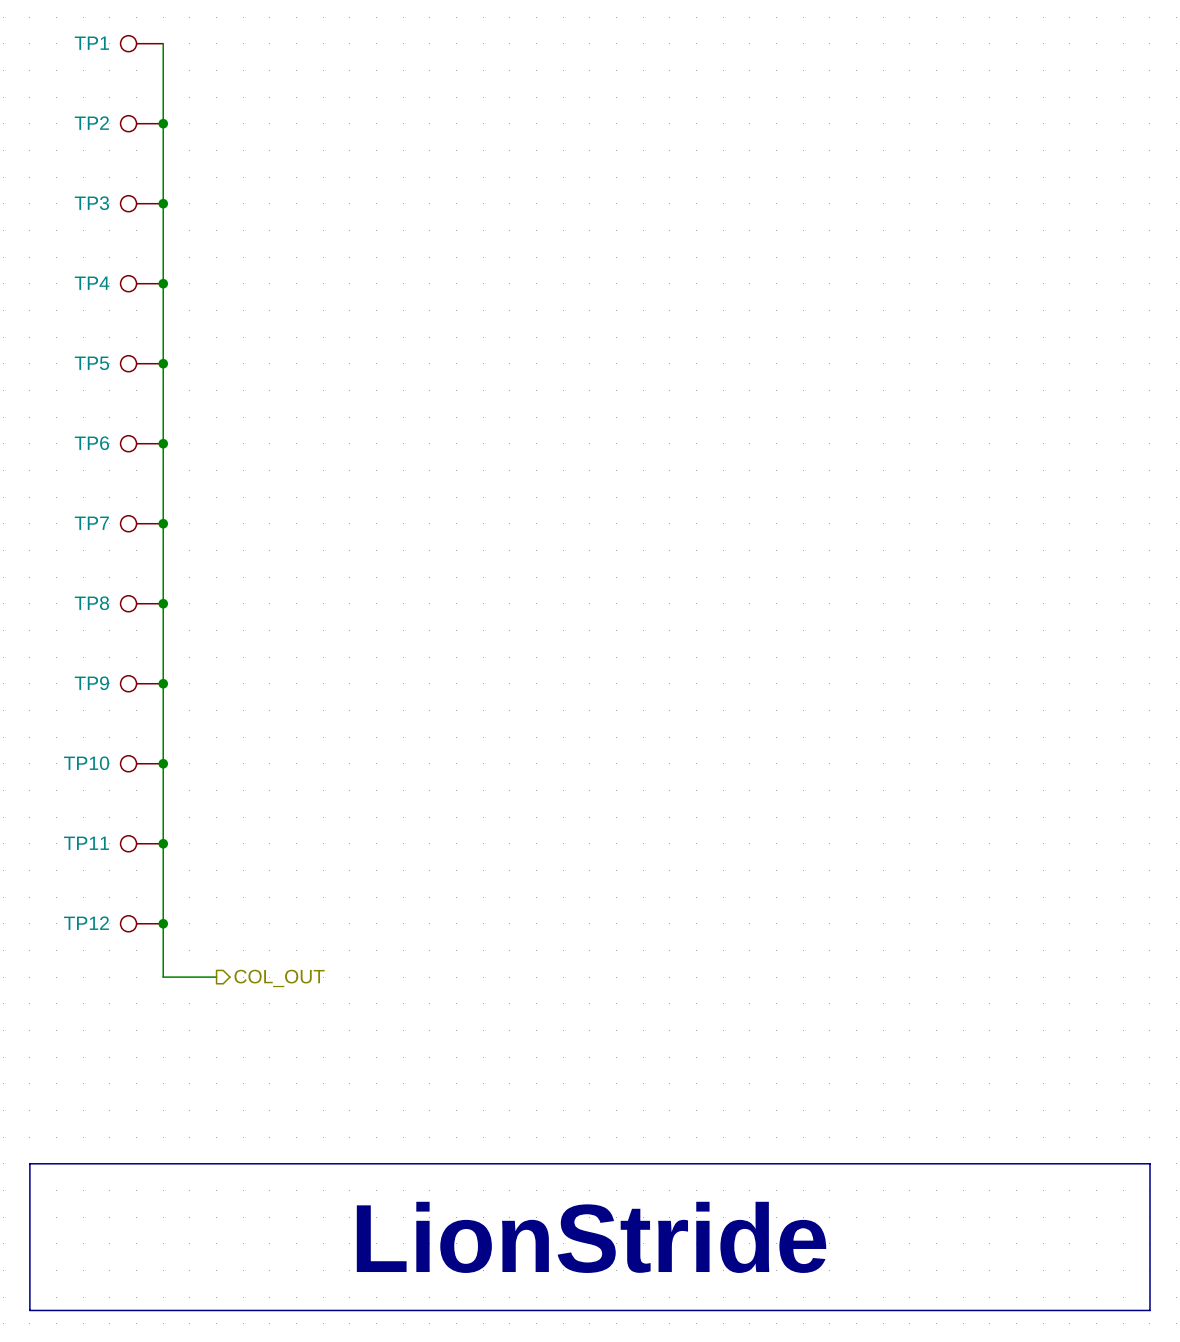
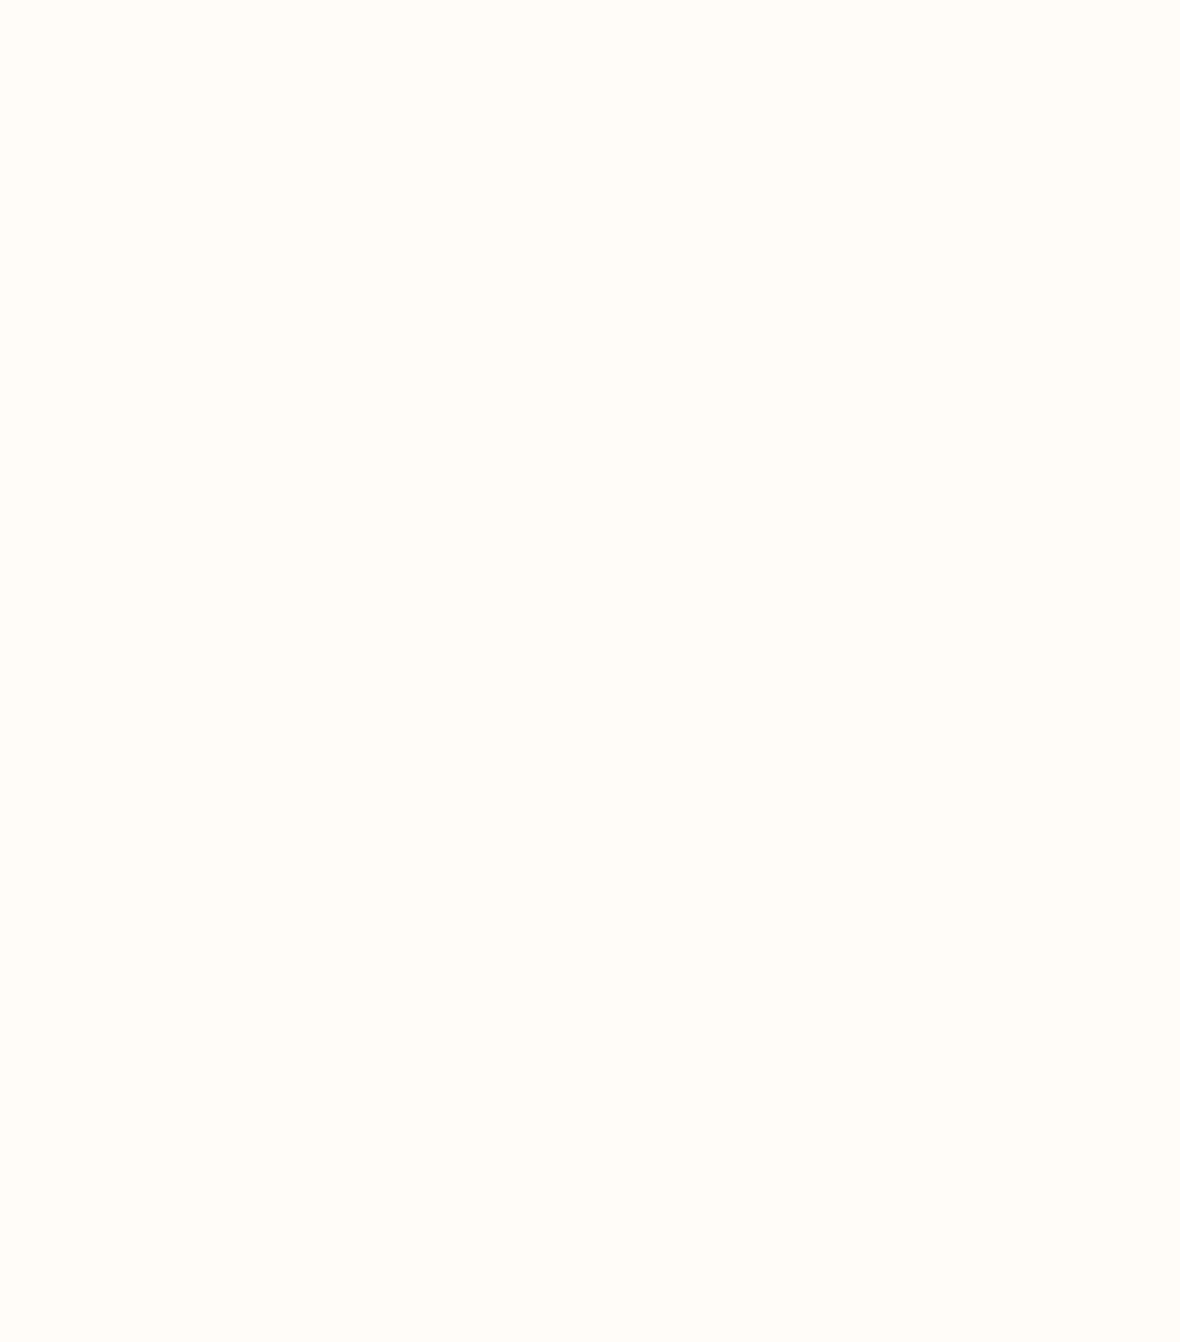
TP1: (141, 43) -> none
wire: (163, 43) (163, 977) (216, 977) -> none
TP2: (141, 123) -> none
junction: (163, 123) -> none
TP3: (141, 203) -> none
junction: (163, 203) -> none
TP4: (141, 283) -> none
junction: (163, 283) -> none
TP5: (141, 363) -> none
junction: (163, 363) -> none
TP6: (141, 443) -> none
junction: (163, 443) -> none
TP7: (141, 523) -> none
junction: (163, 523) -> none
TP8: (141, 603) -> none
junction: (163, 603) -> none
TP9: (141, 683) -> none
junction: (163, 683) -> none
TP10: (141, 763) -> none
junction: (163, 763) -> none
TP11: (141, 843) -> none
junction: (163, 843) -> none
TP12: (141, 923) -> none
junction: (163, 923) -> none
hierarchical label: COL_OUT (279, 978) -> none
line: (29, 1163) (1149, 1163) (1149, 1310) (29, 1310) (29, 1163) -> none
text: LionStride (591, 1237) -> none

